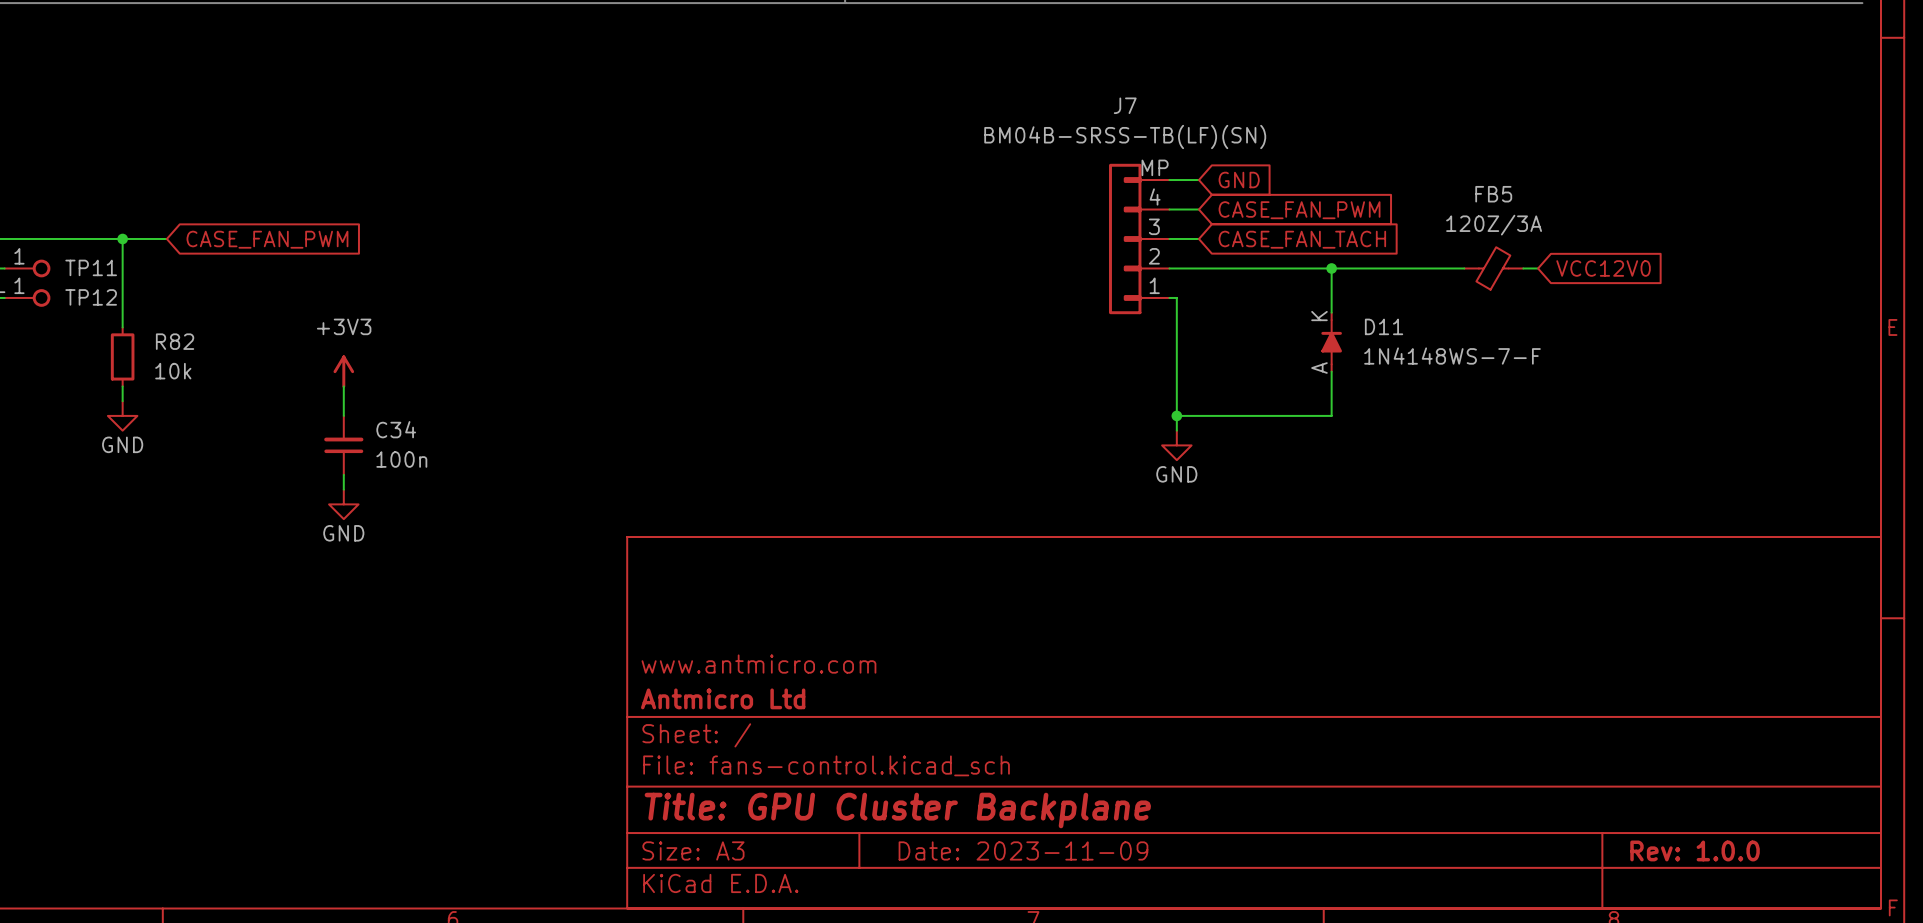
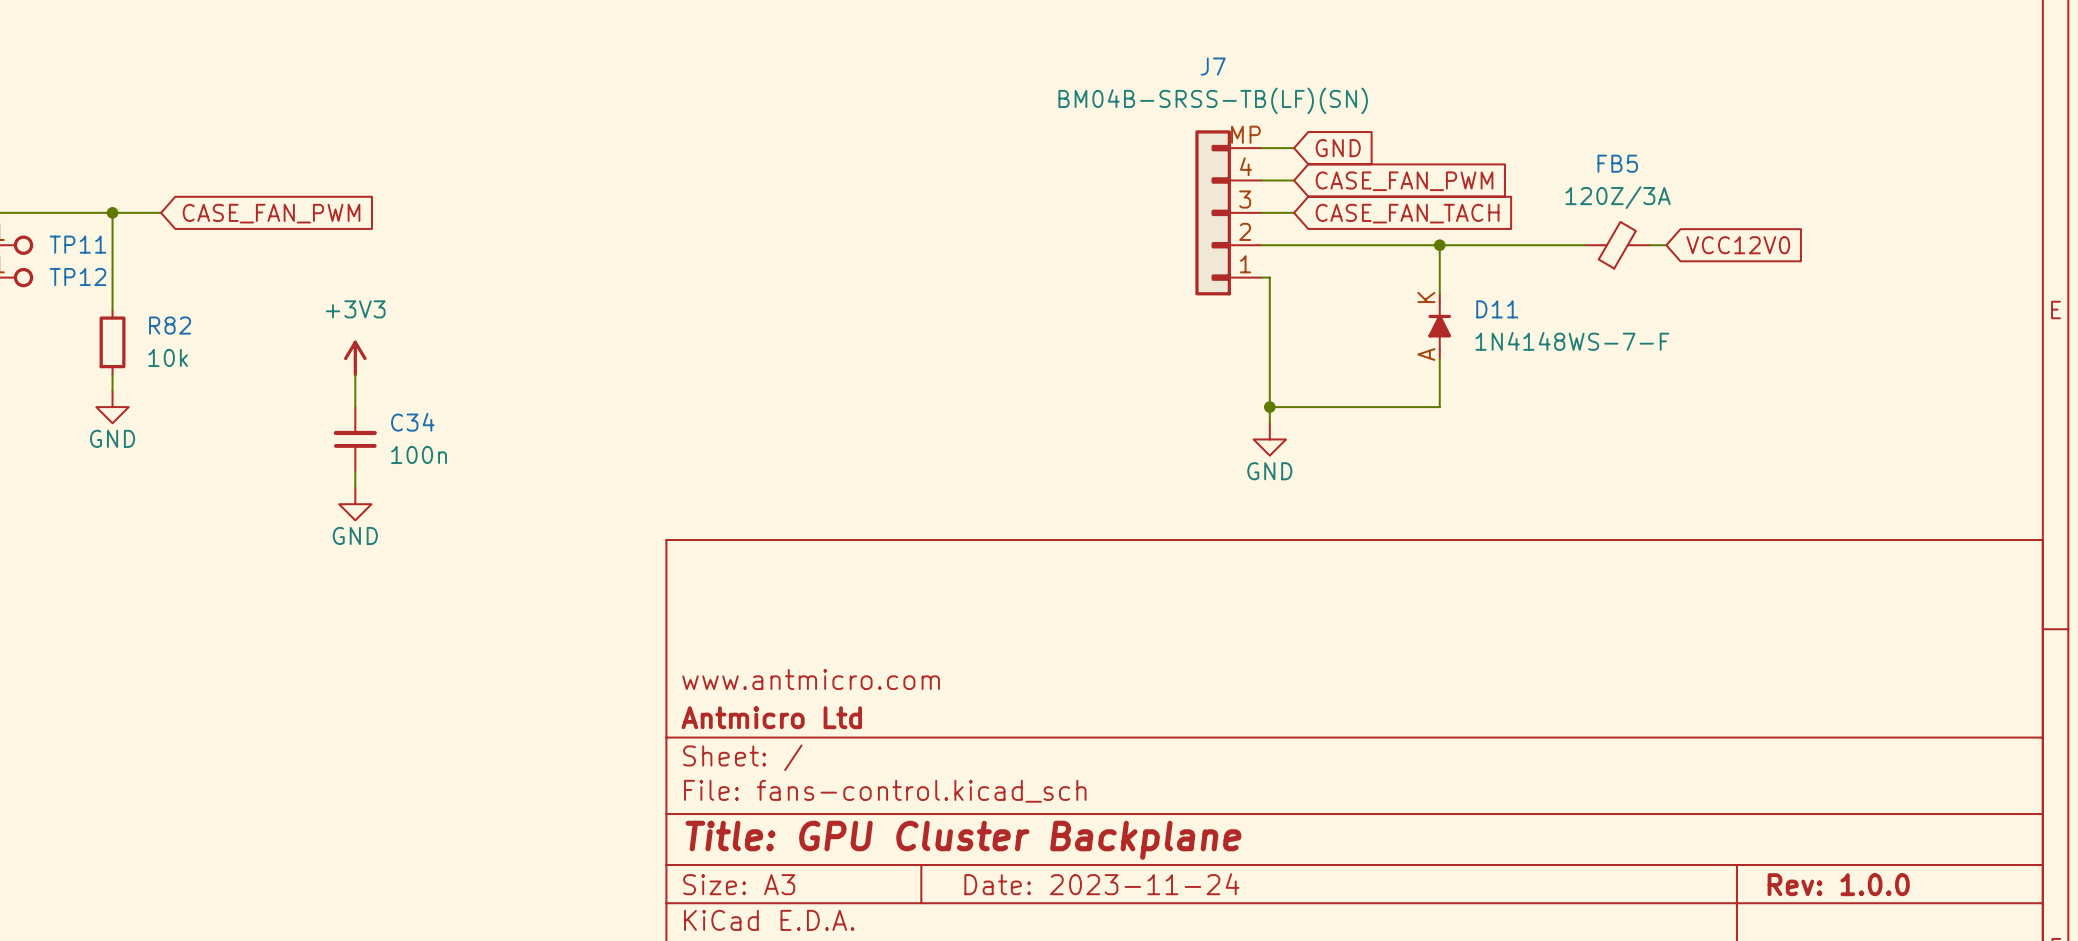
title block: Date: 2023-11-09 (1023, 850) -> Date: 2023-11-24 (1101, 884)

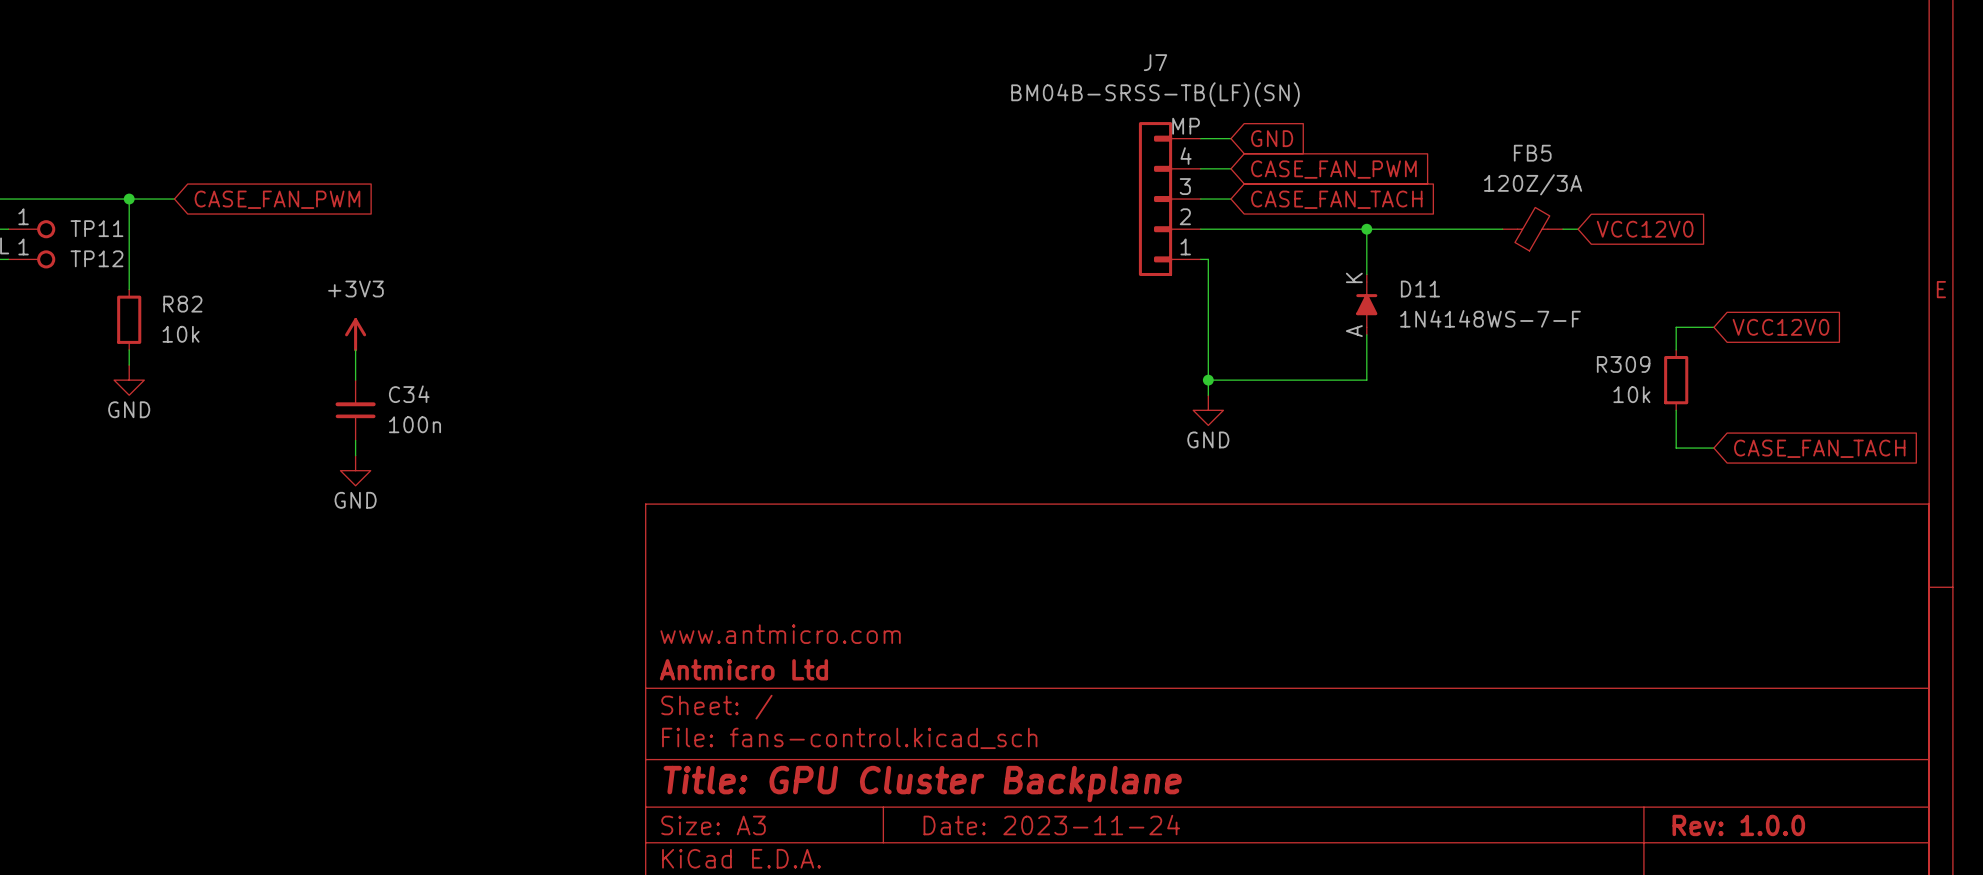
wire: none -> (1713, 327) (1676, 327) (1676, 349)
global label: none -> VCC12V0 (1780, 327)
R309: none -> (1676, 380)
wire: none -> (1676, 410) (1676, 448) (1713, 448)
global label: none -> CASE_FAN_TACH (1819, 448)

